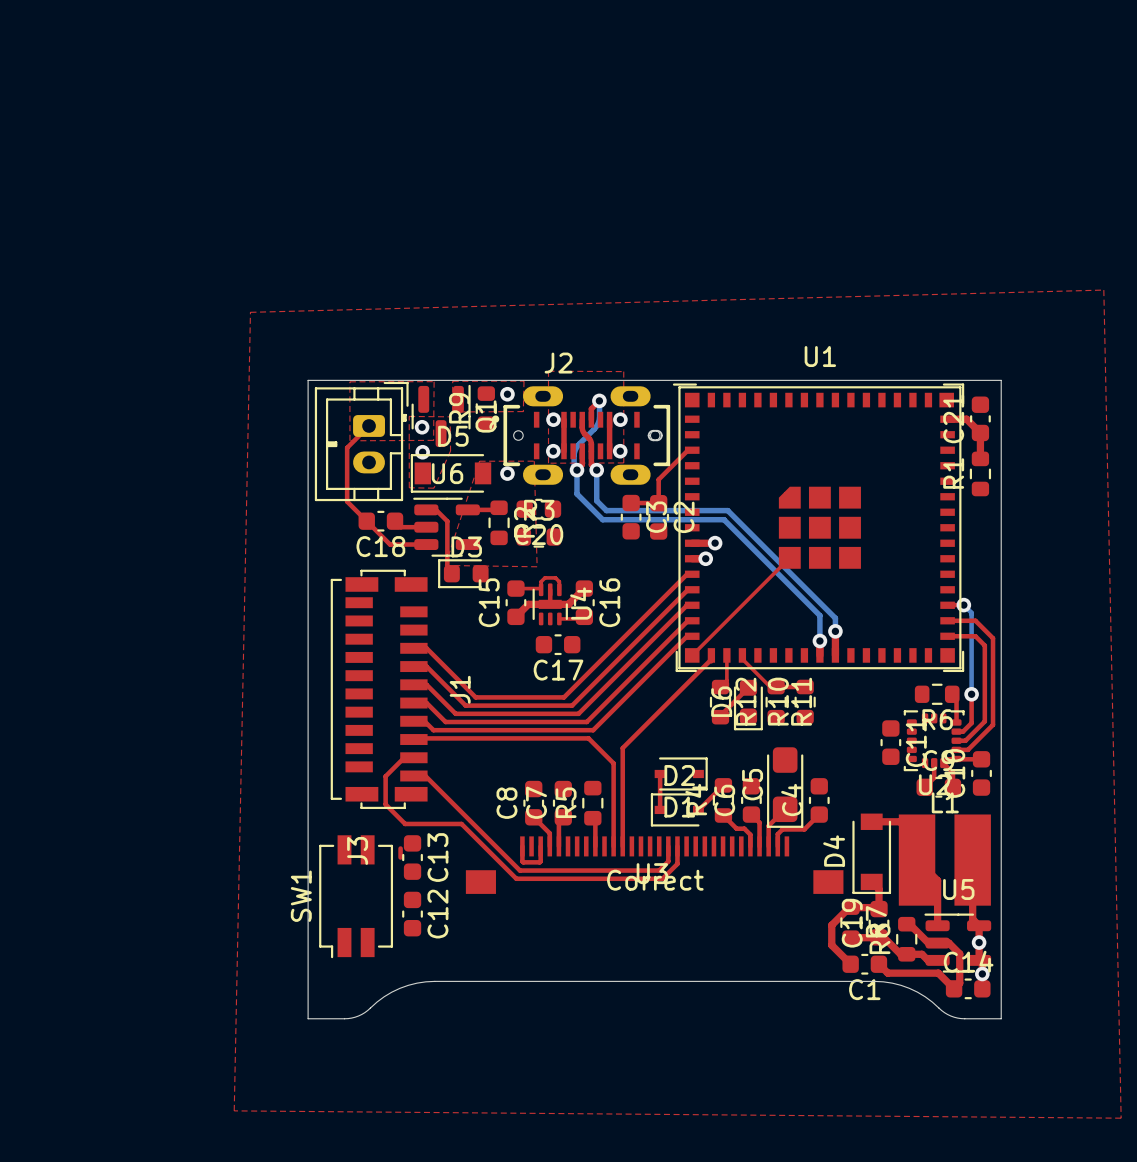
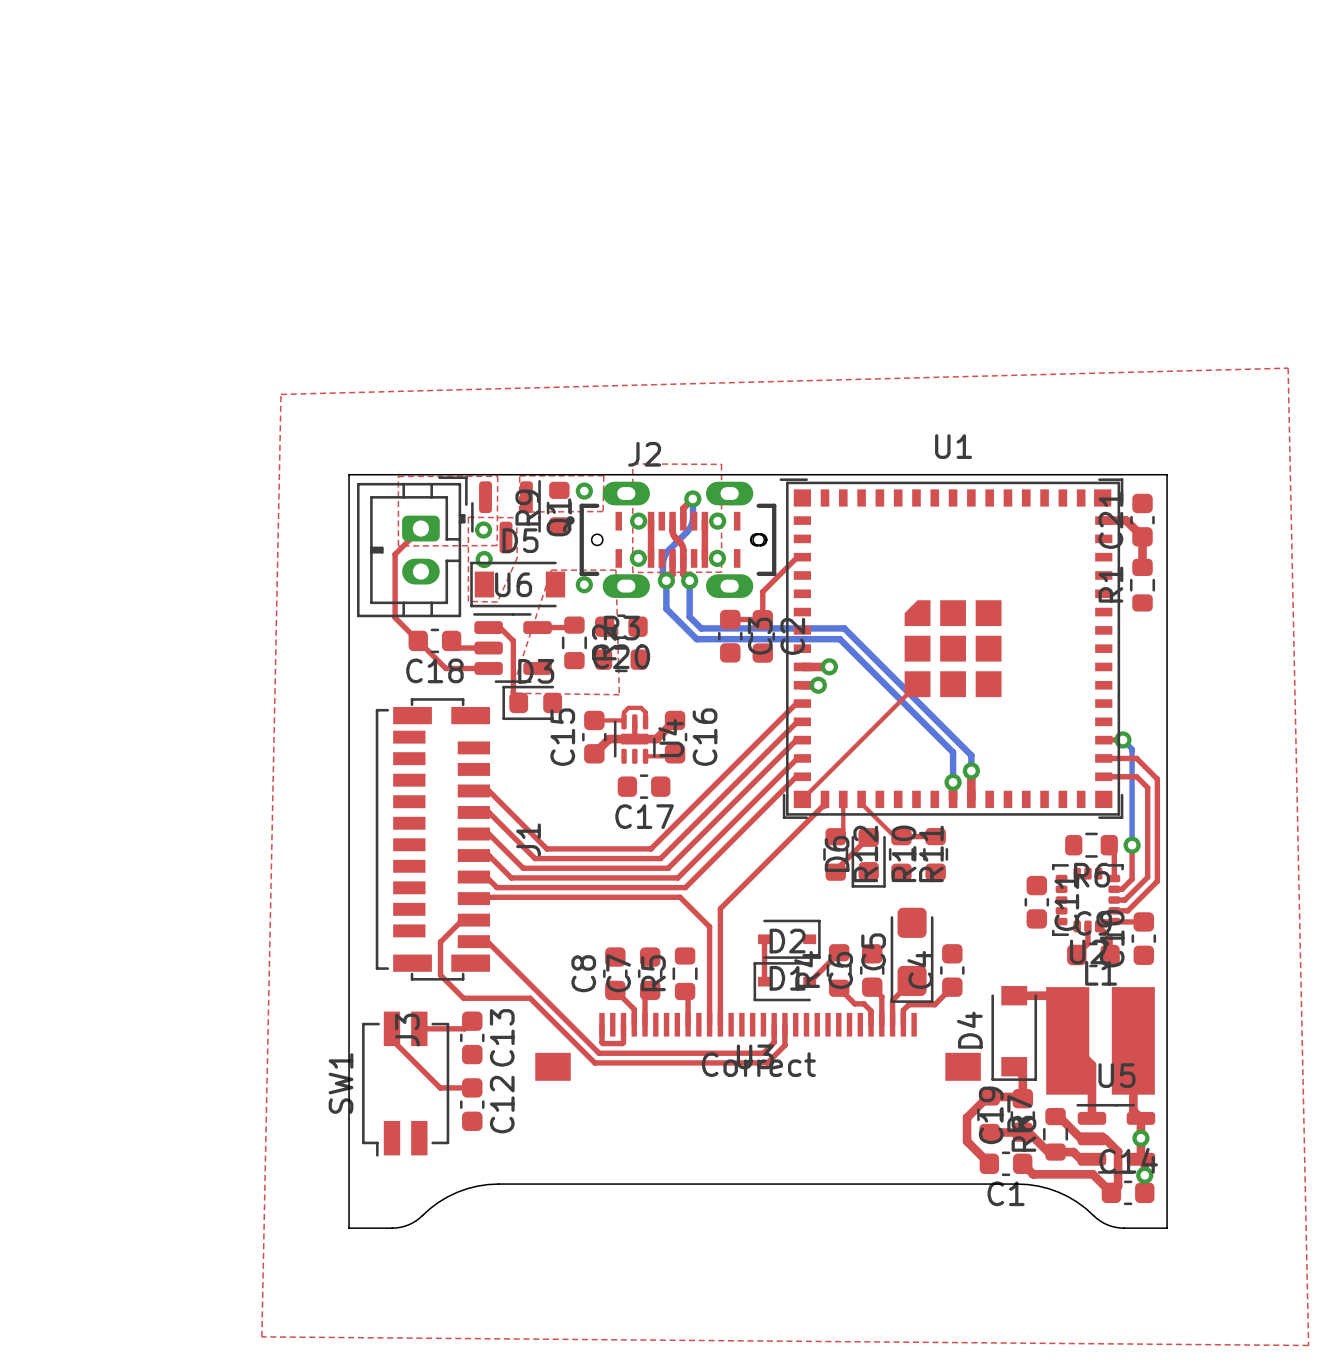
top track: none -> (472, 1021) (464, 1028) (419, 1028)
top track: (400, 848) (400, 857) -> none
top track: none -> (391, 1028) (391, 1039) (440, 1087) (472, 1087)

